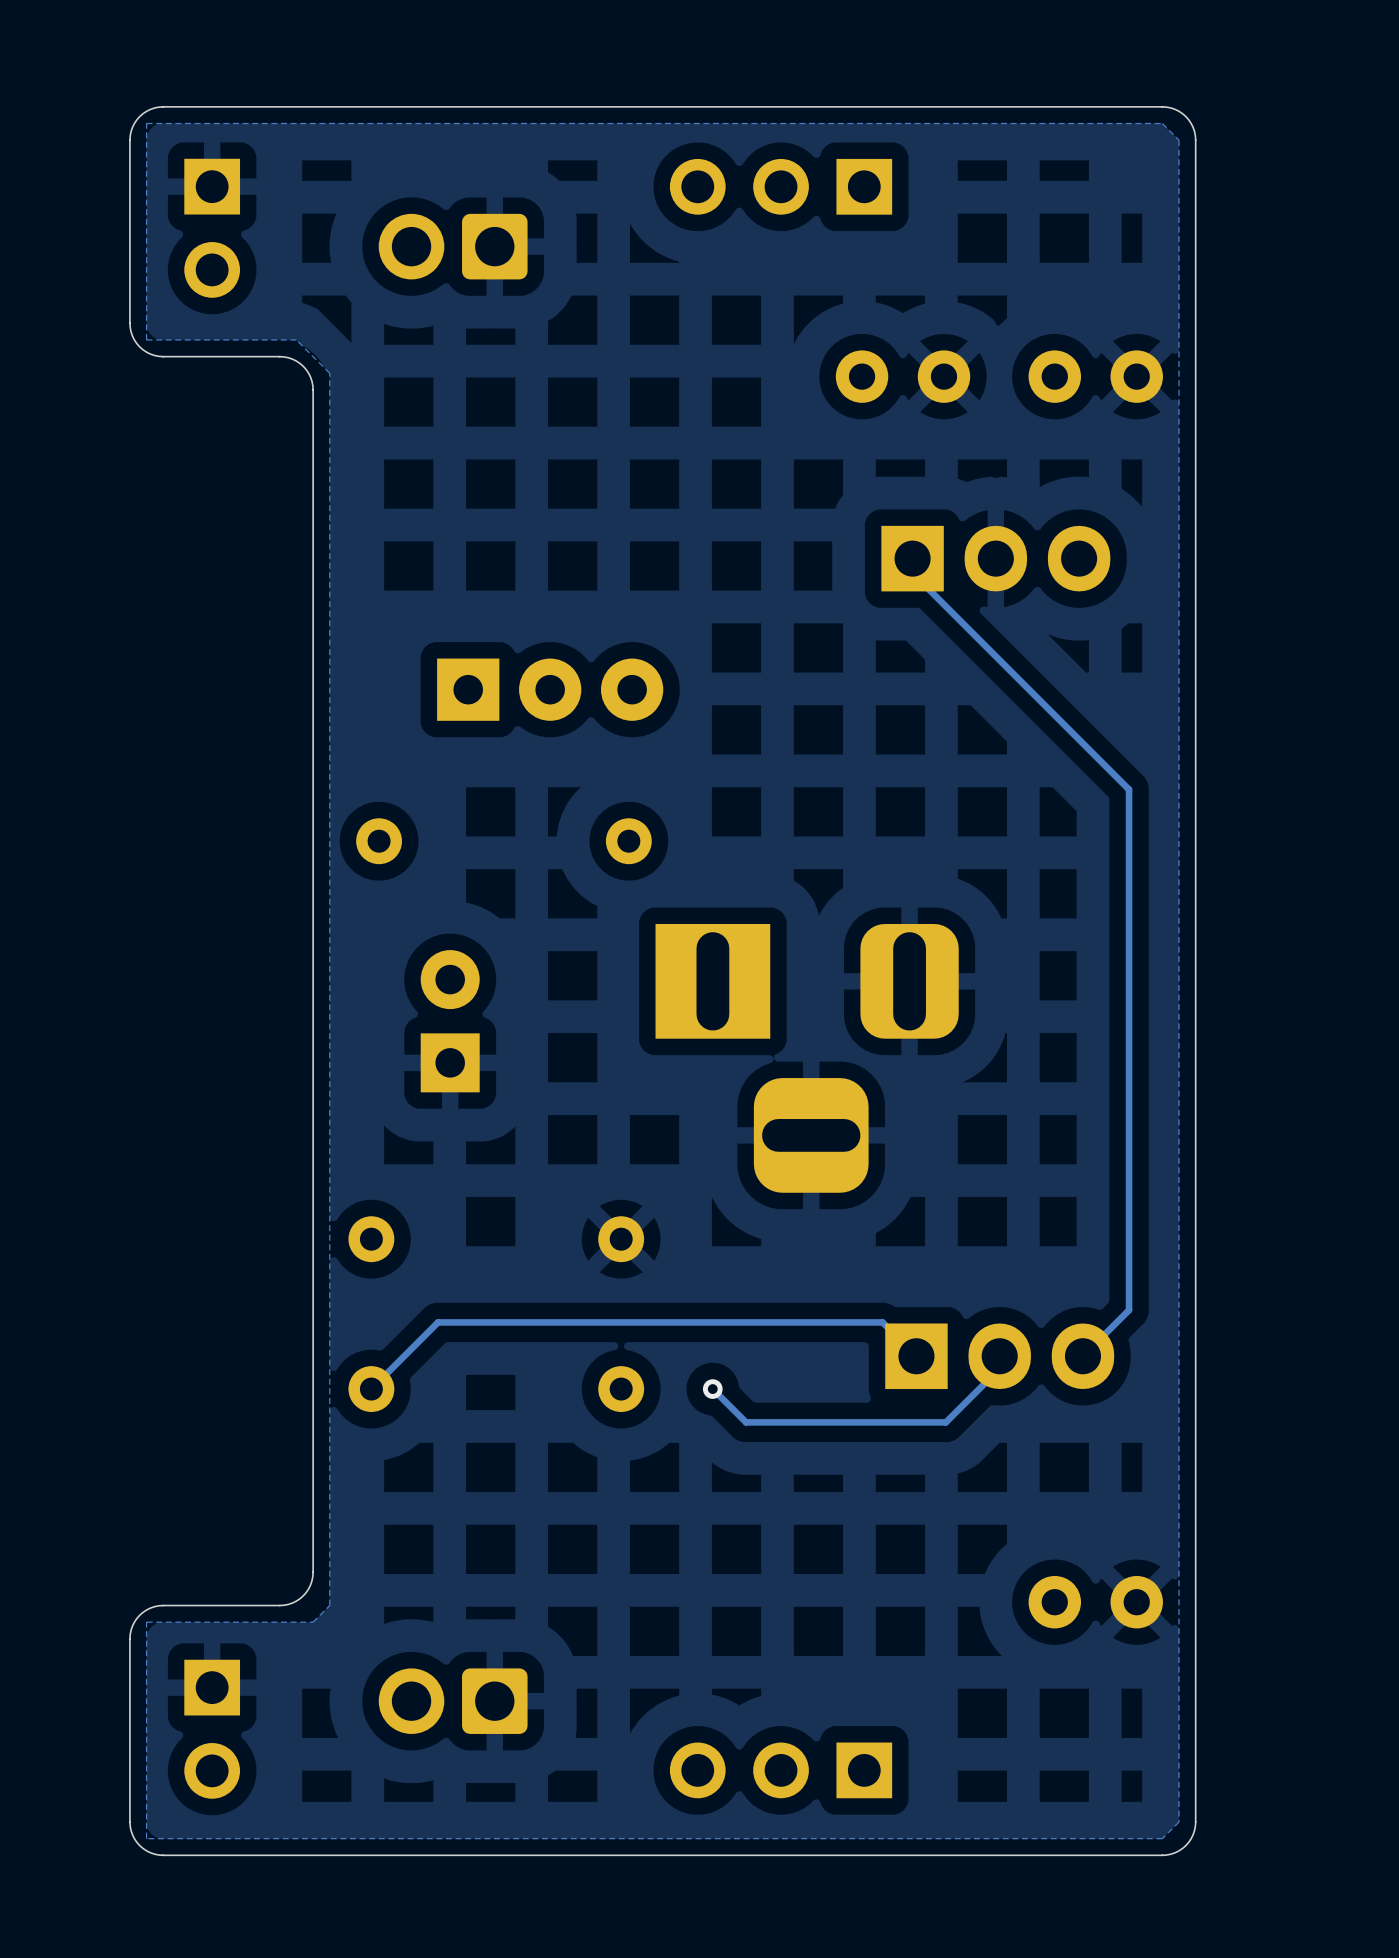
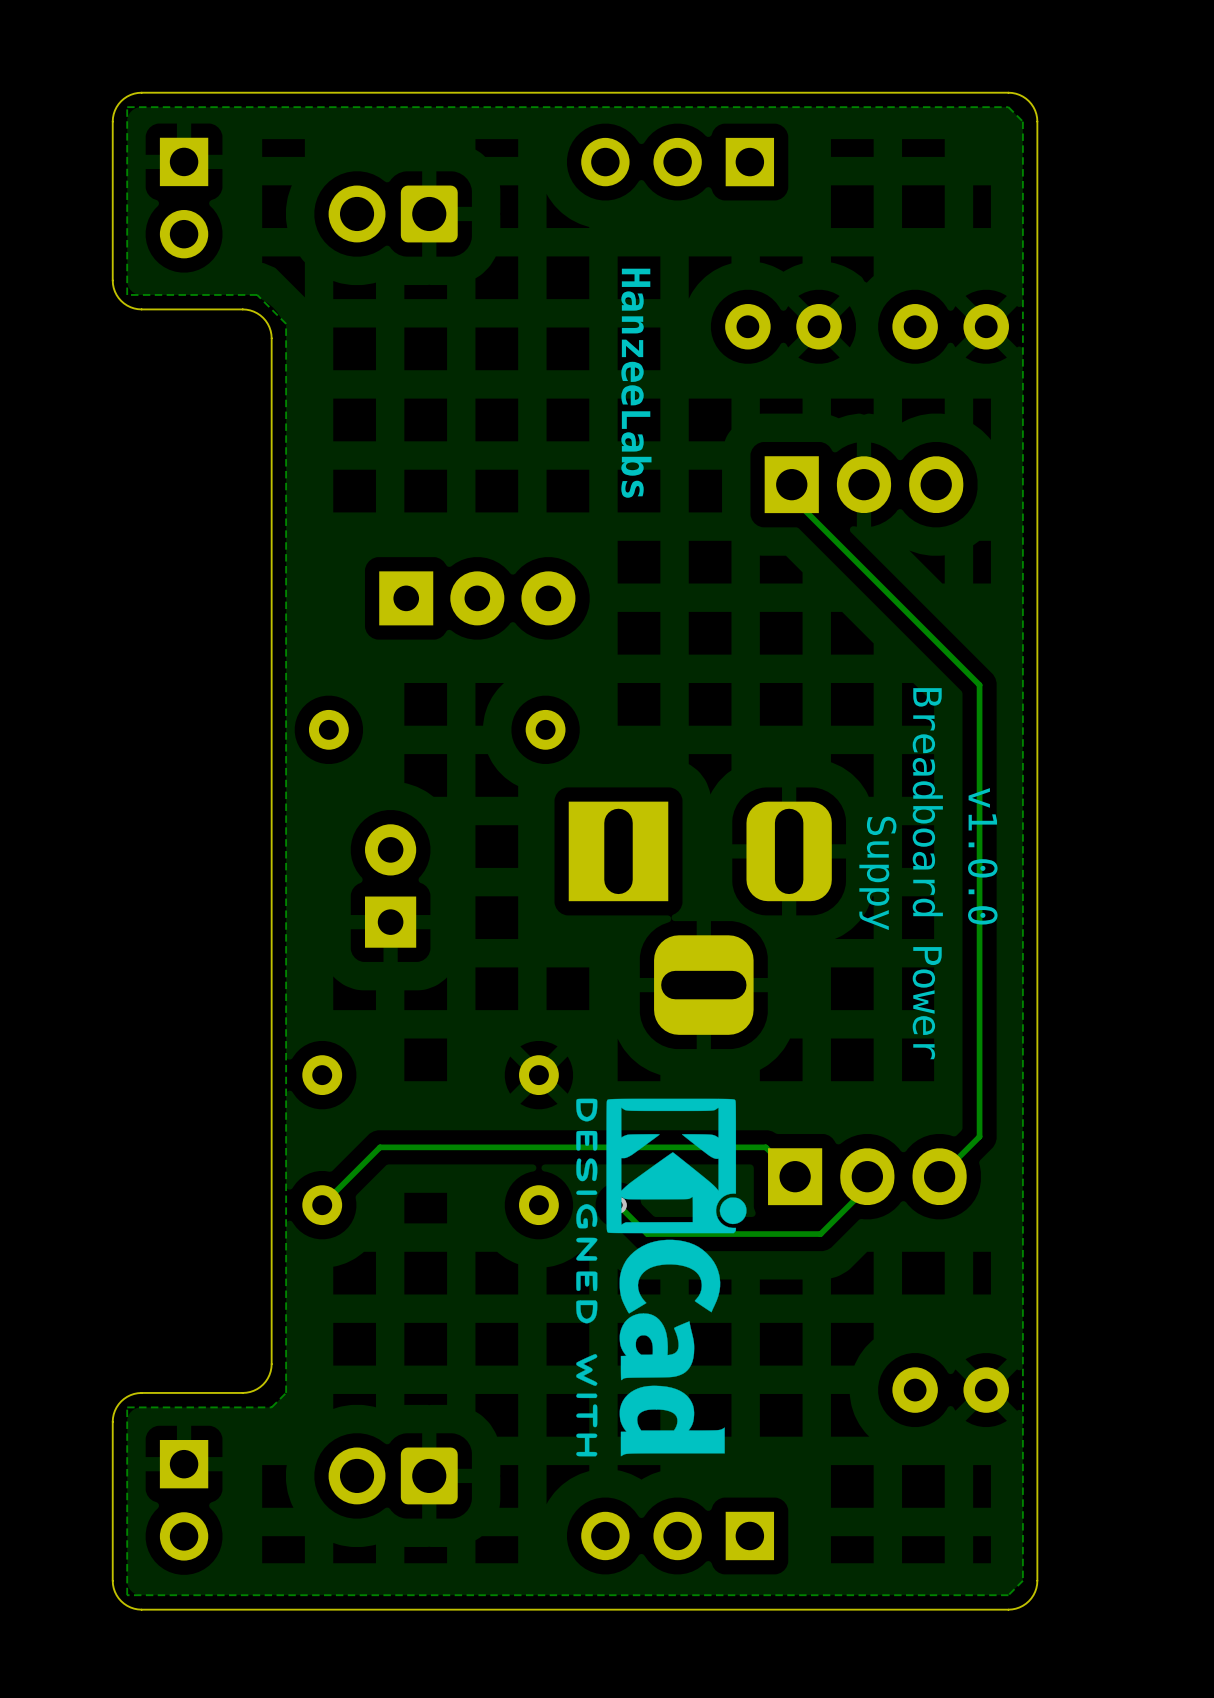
text: none -> HanzeeLabs (636, 383)
text: none -> v1.0.0 (982, 856)
text: none -> Suppy (877, 873)
text: none -> Breadboard Power (927, 873)
drawing: none -> [576, 1098, 747, 1457]

